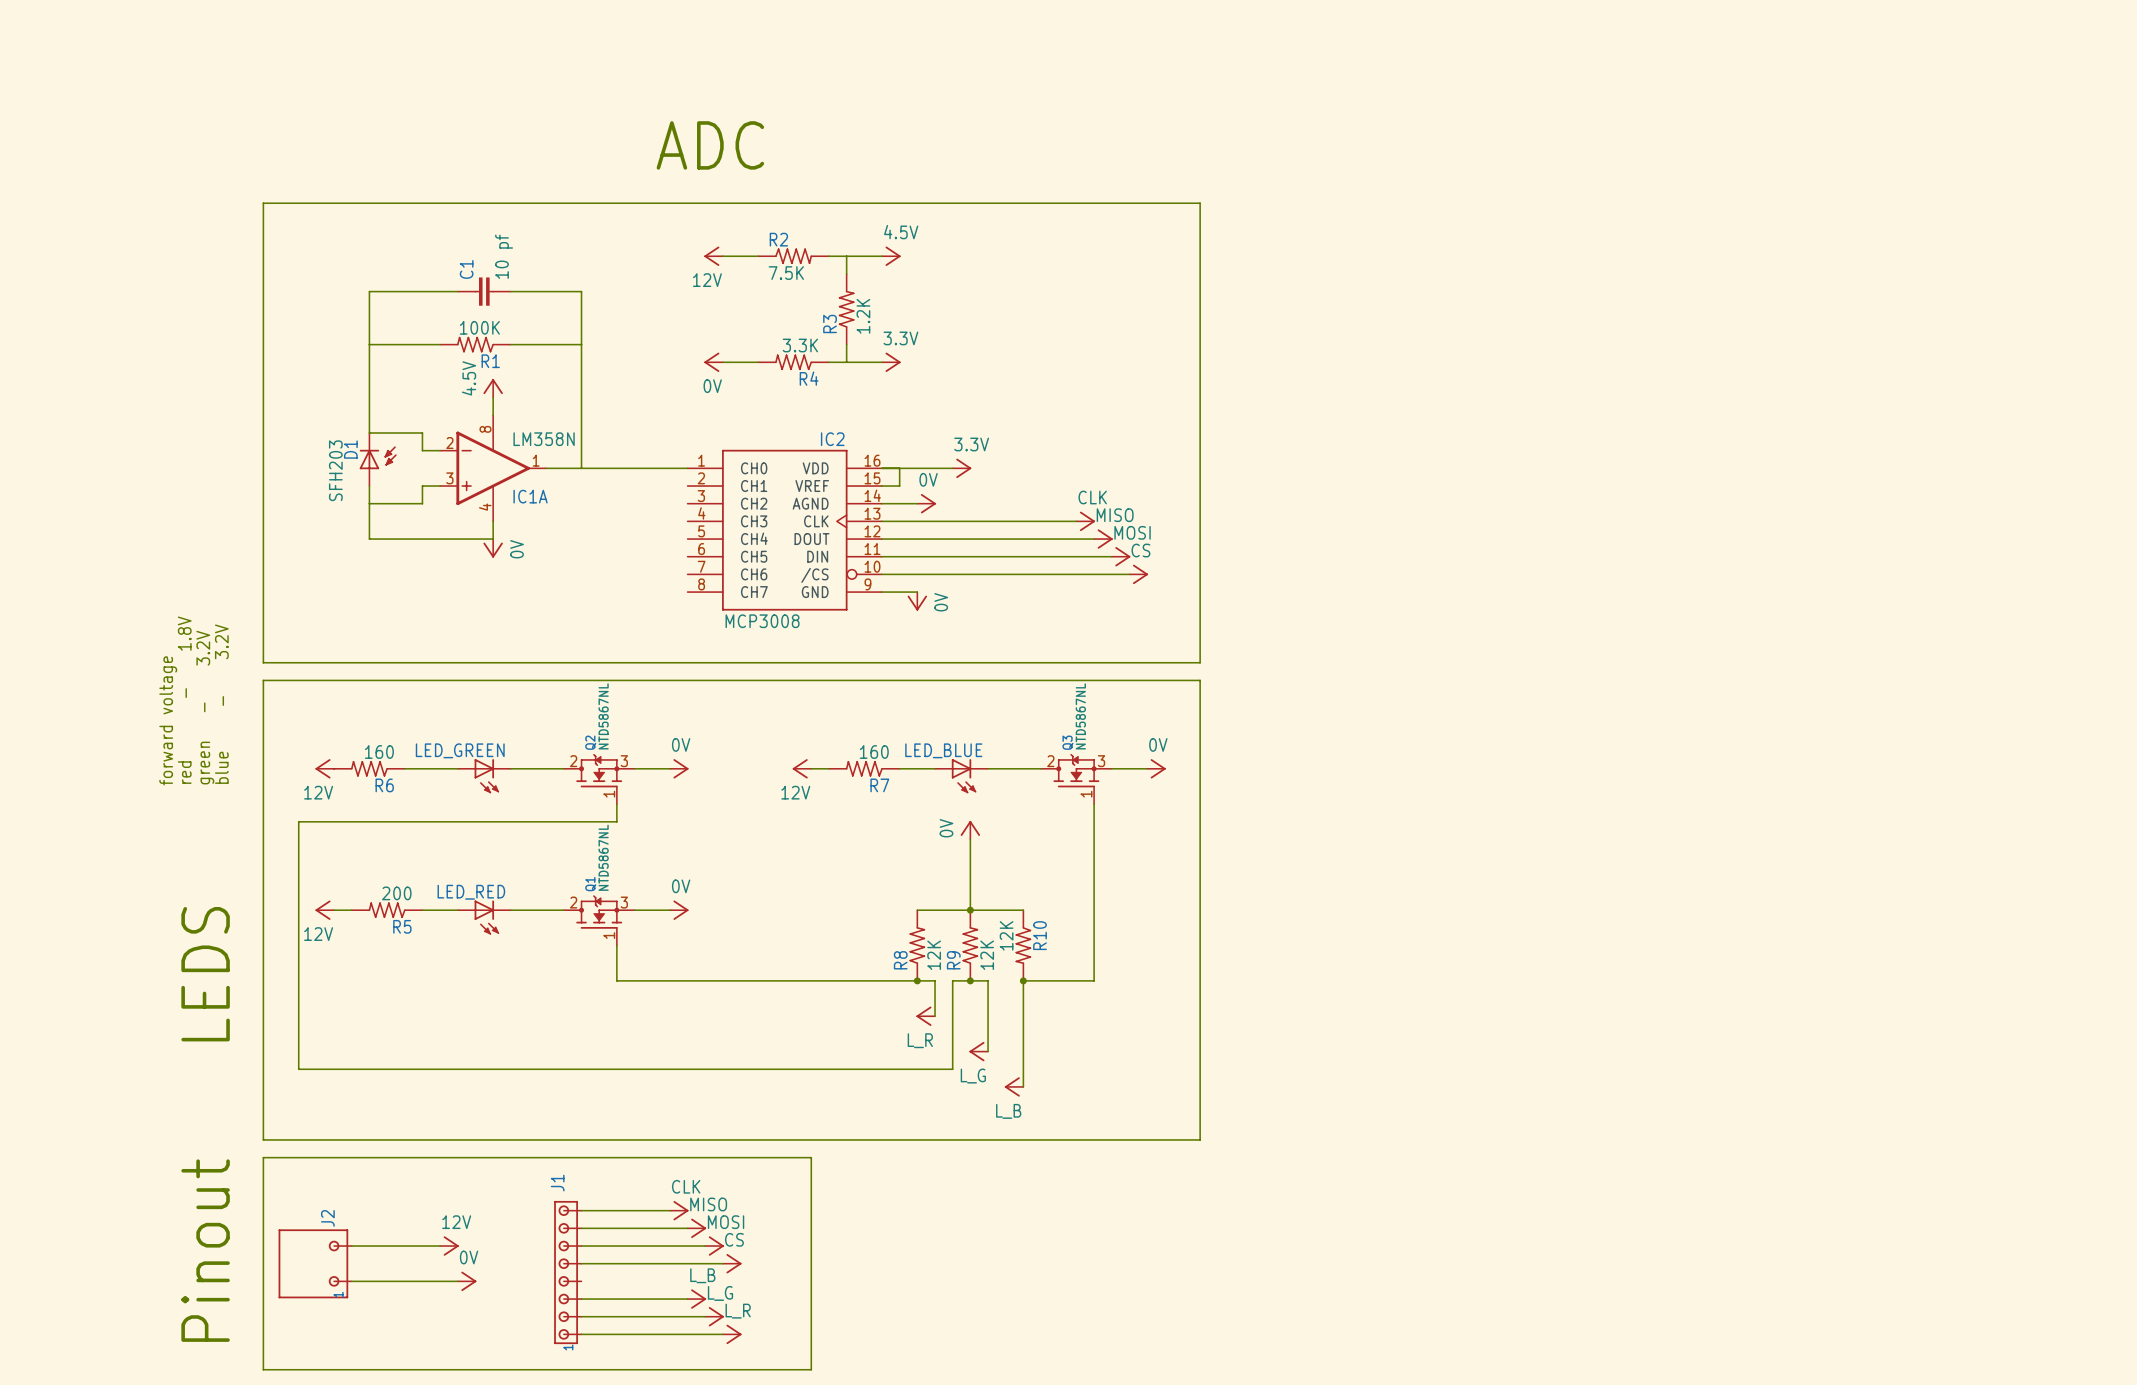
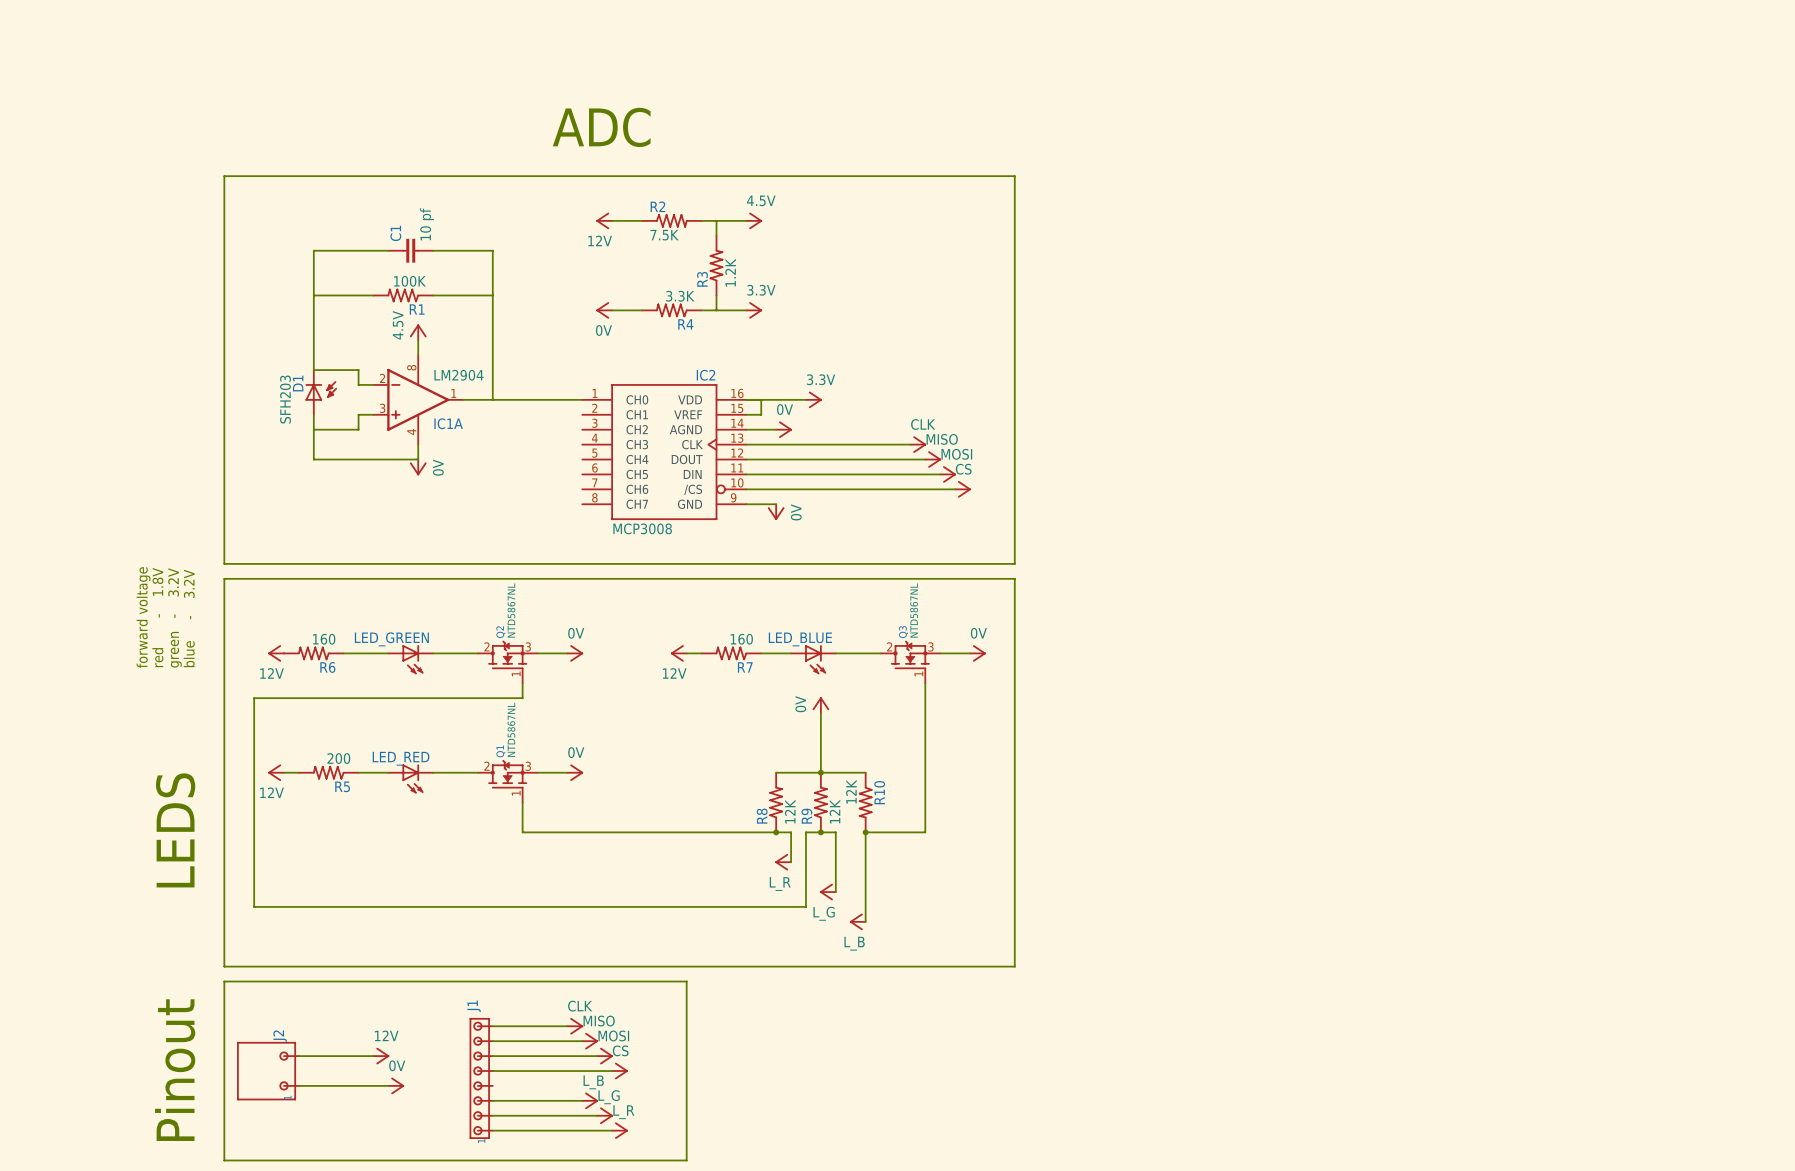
IC1A value: LM358N (544, 439) -> LM2904 (458, 375)

